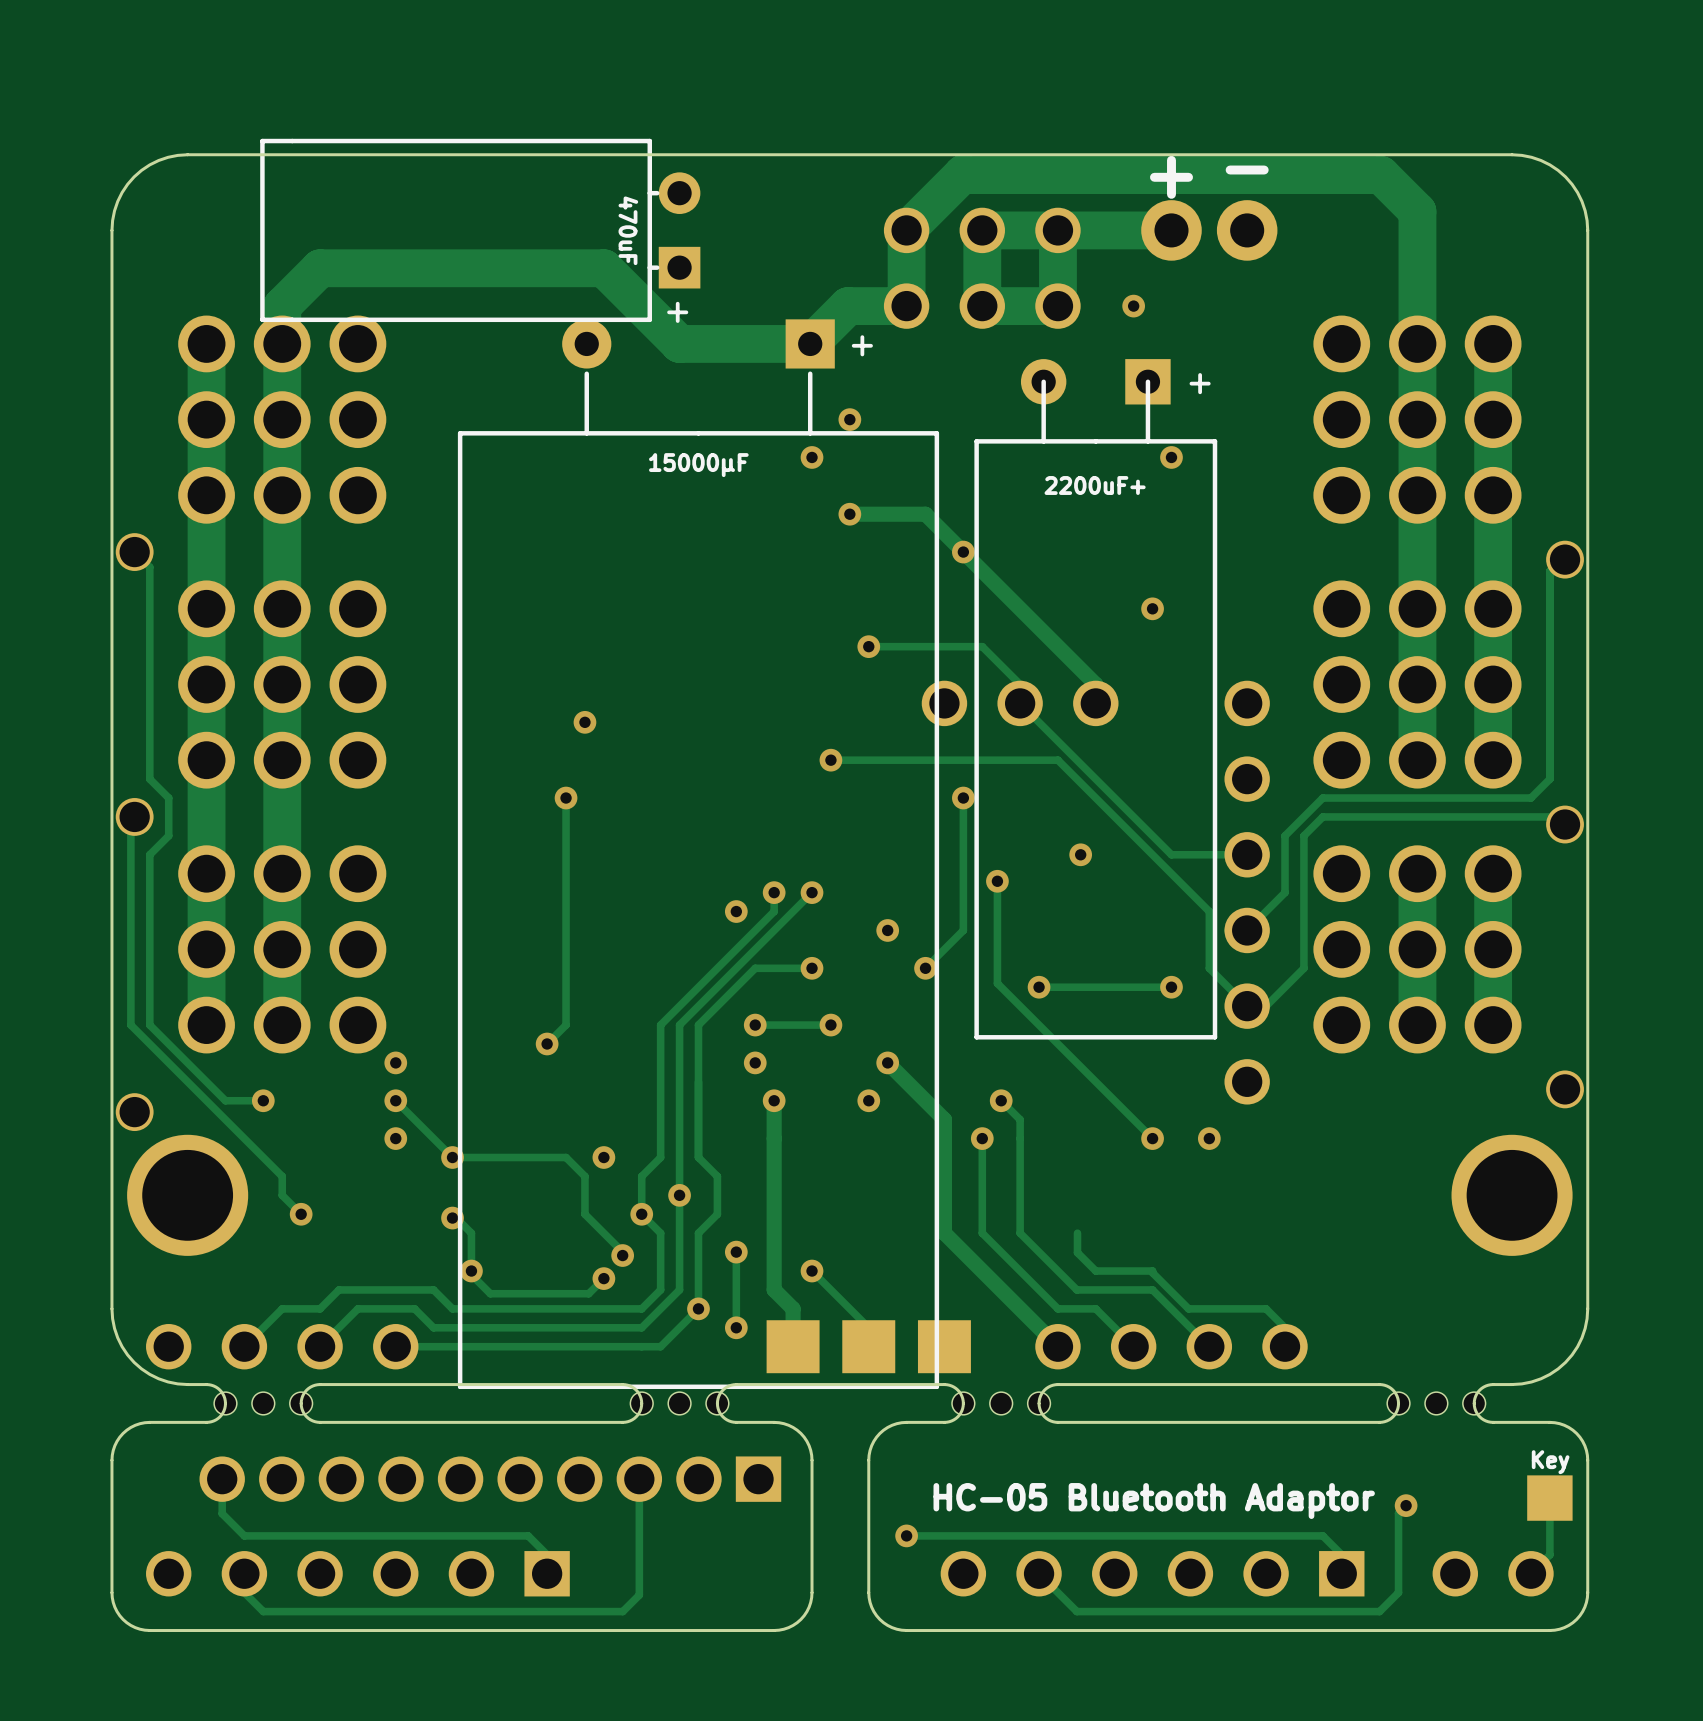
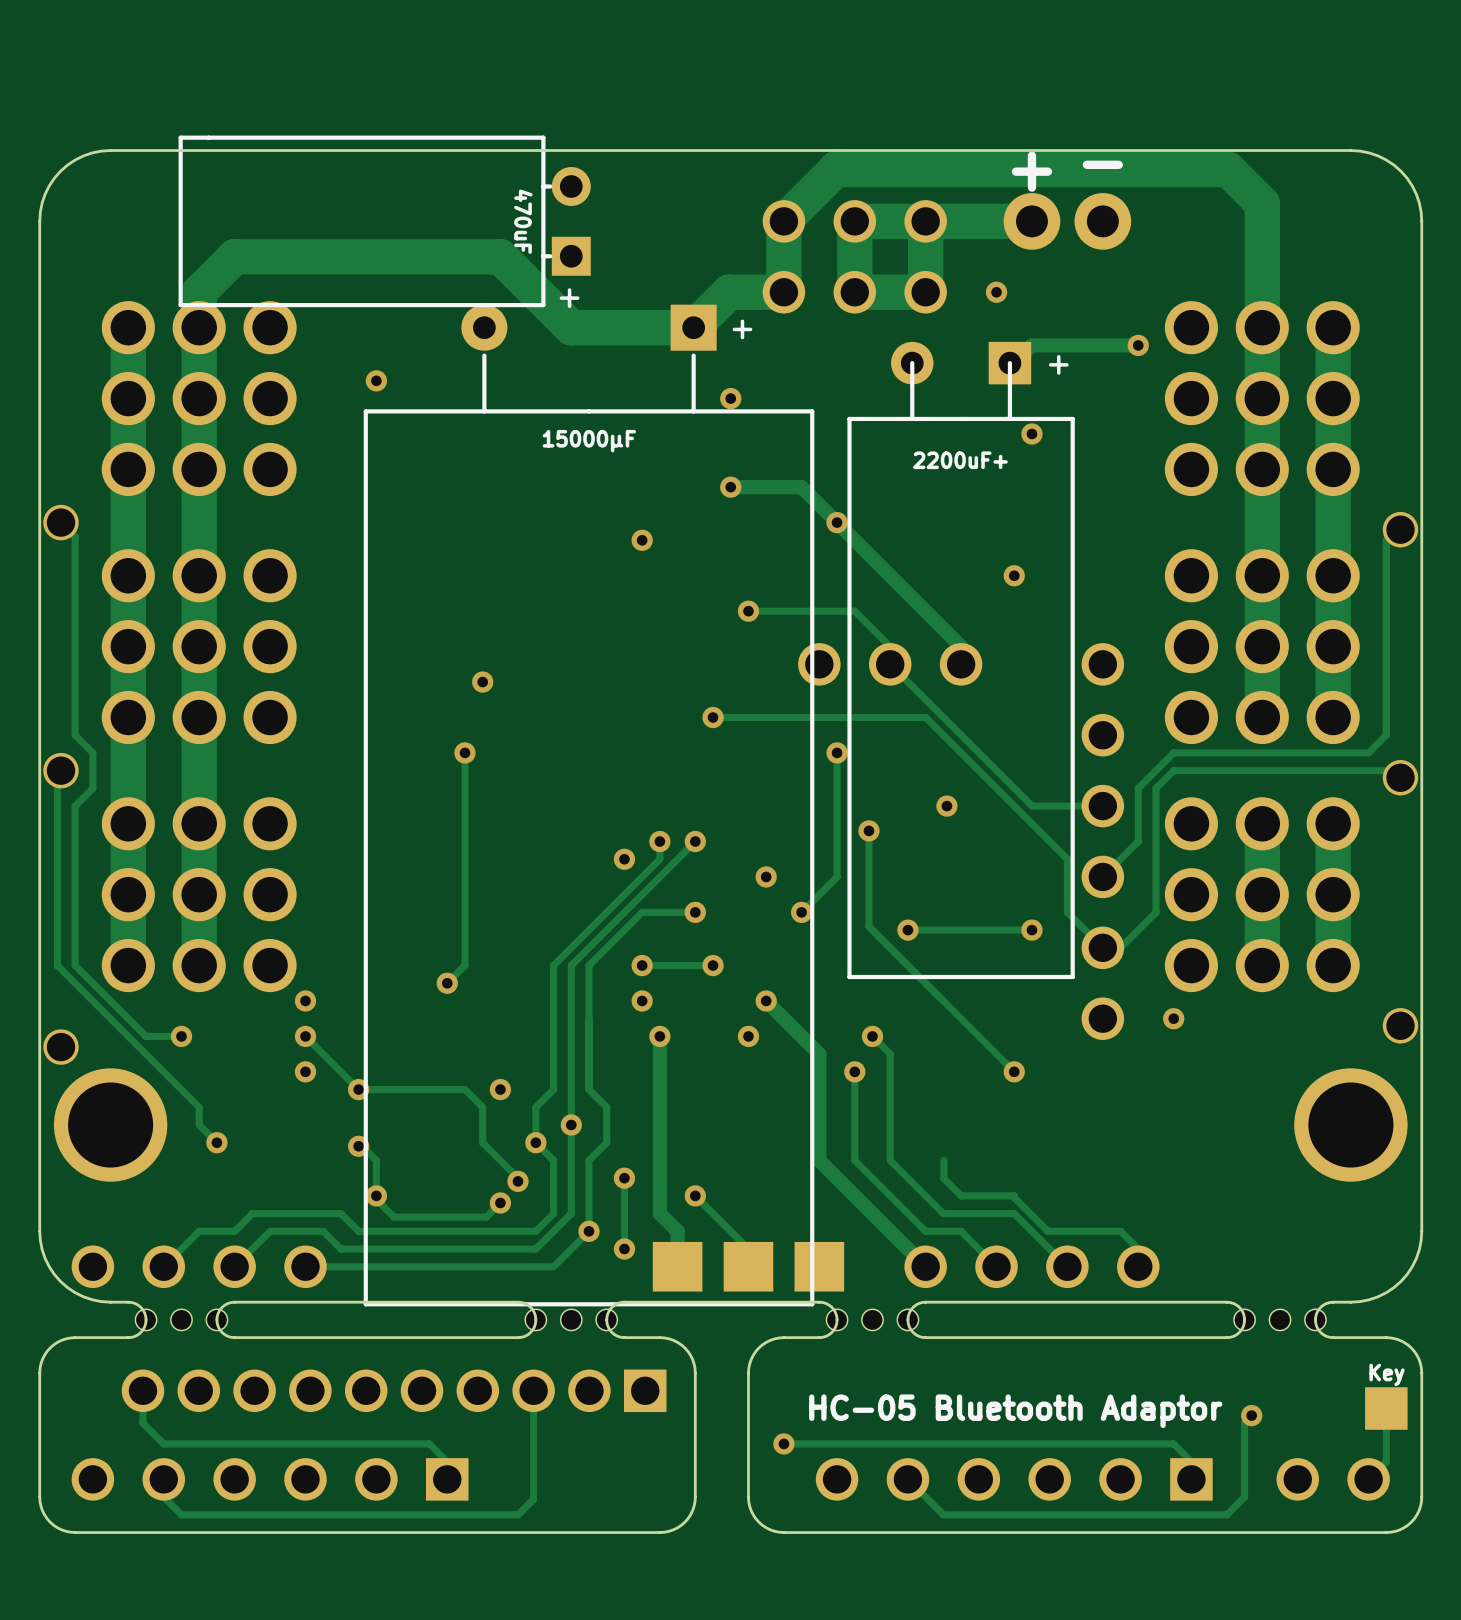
track: none -> (1138, 345) (1031, 345) (1014, 363) (1009, 363)
via: none -> (1138, 345)
via: none -> (376, 380)
via position: (812, 457) -> (642, 540)
via position: (1209, 1138) -> (1173, 1018)

